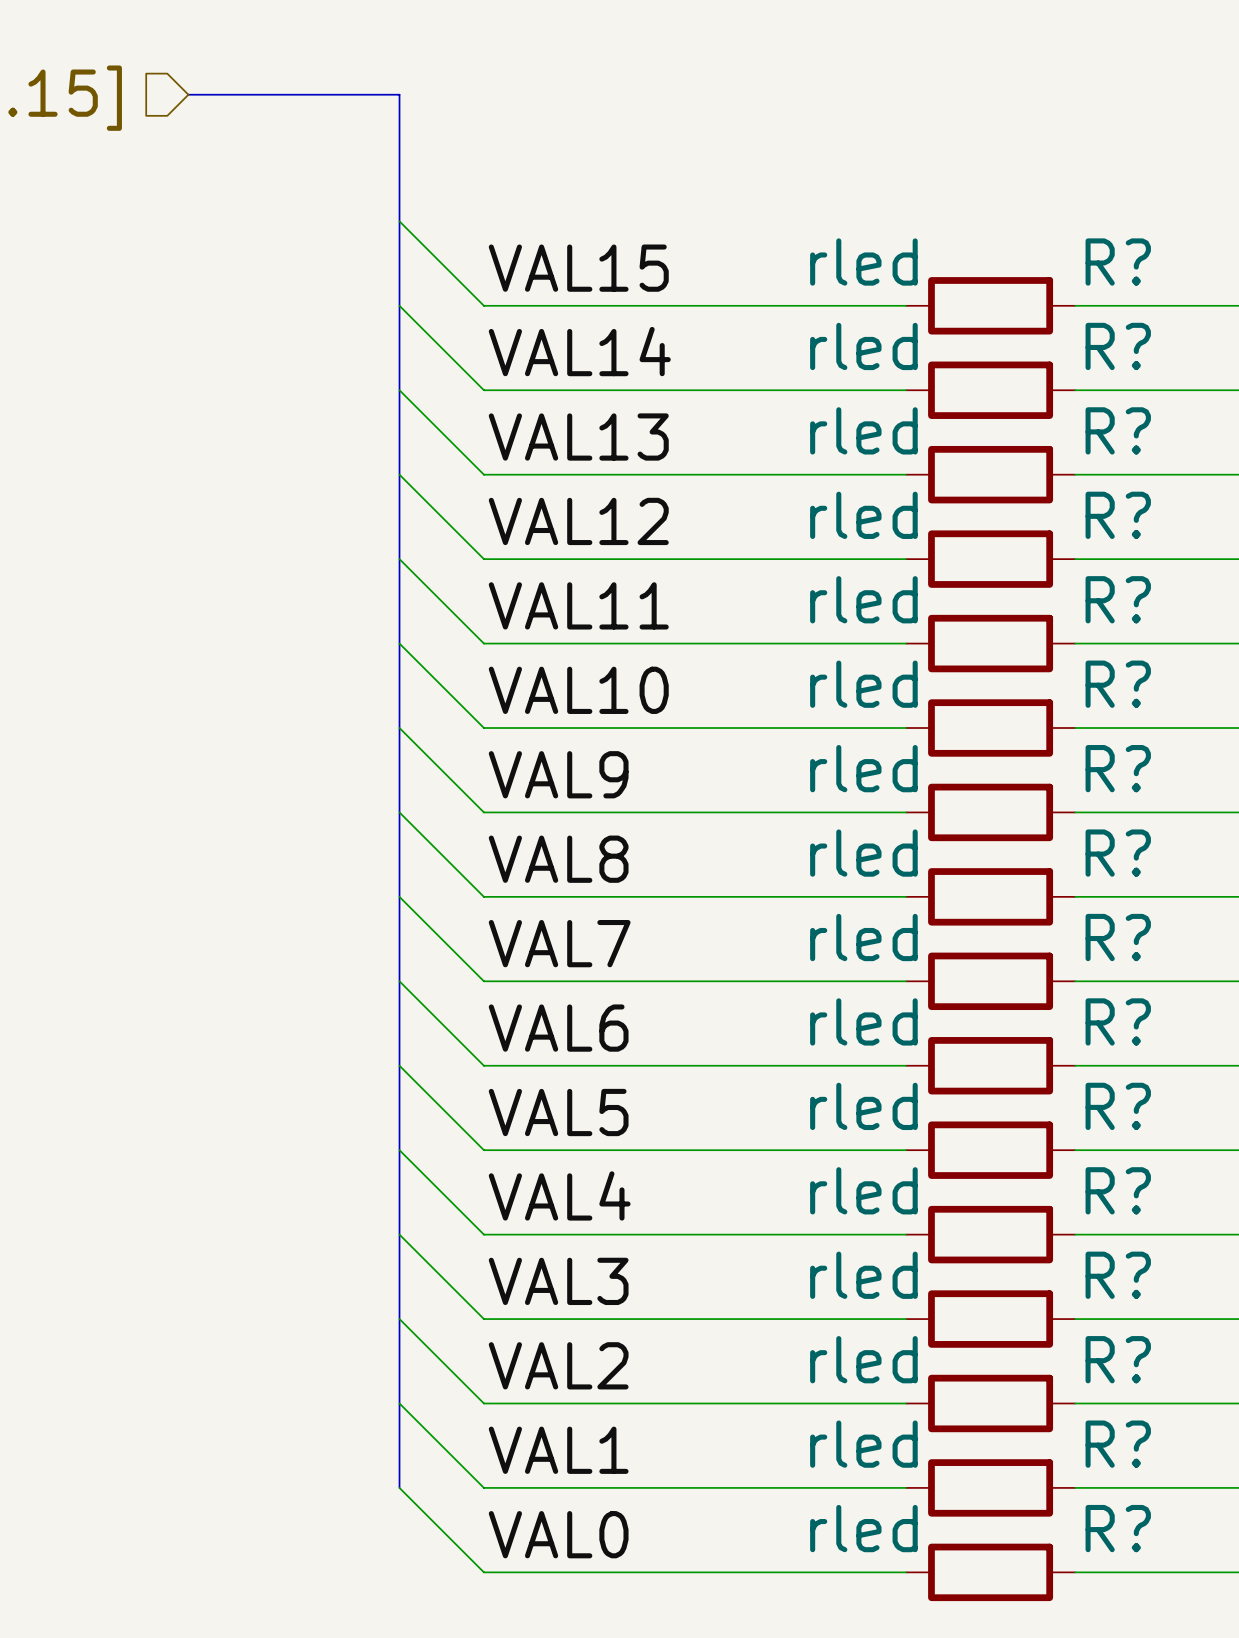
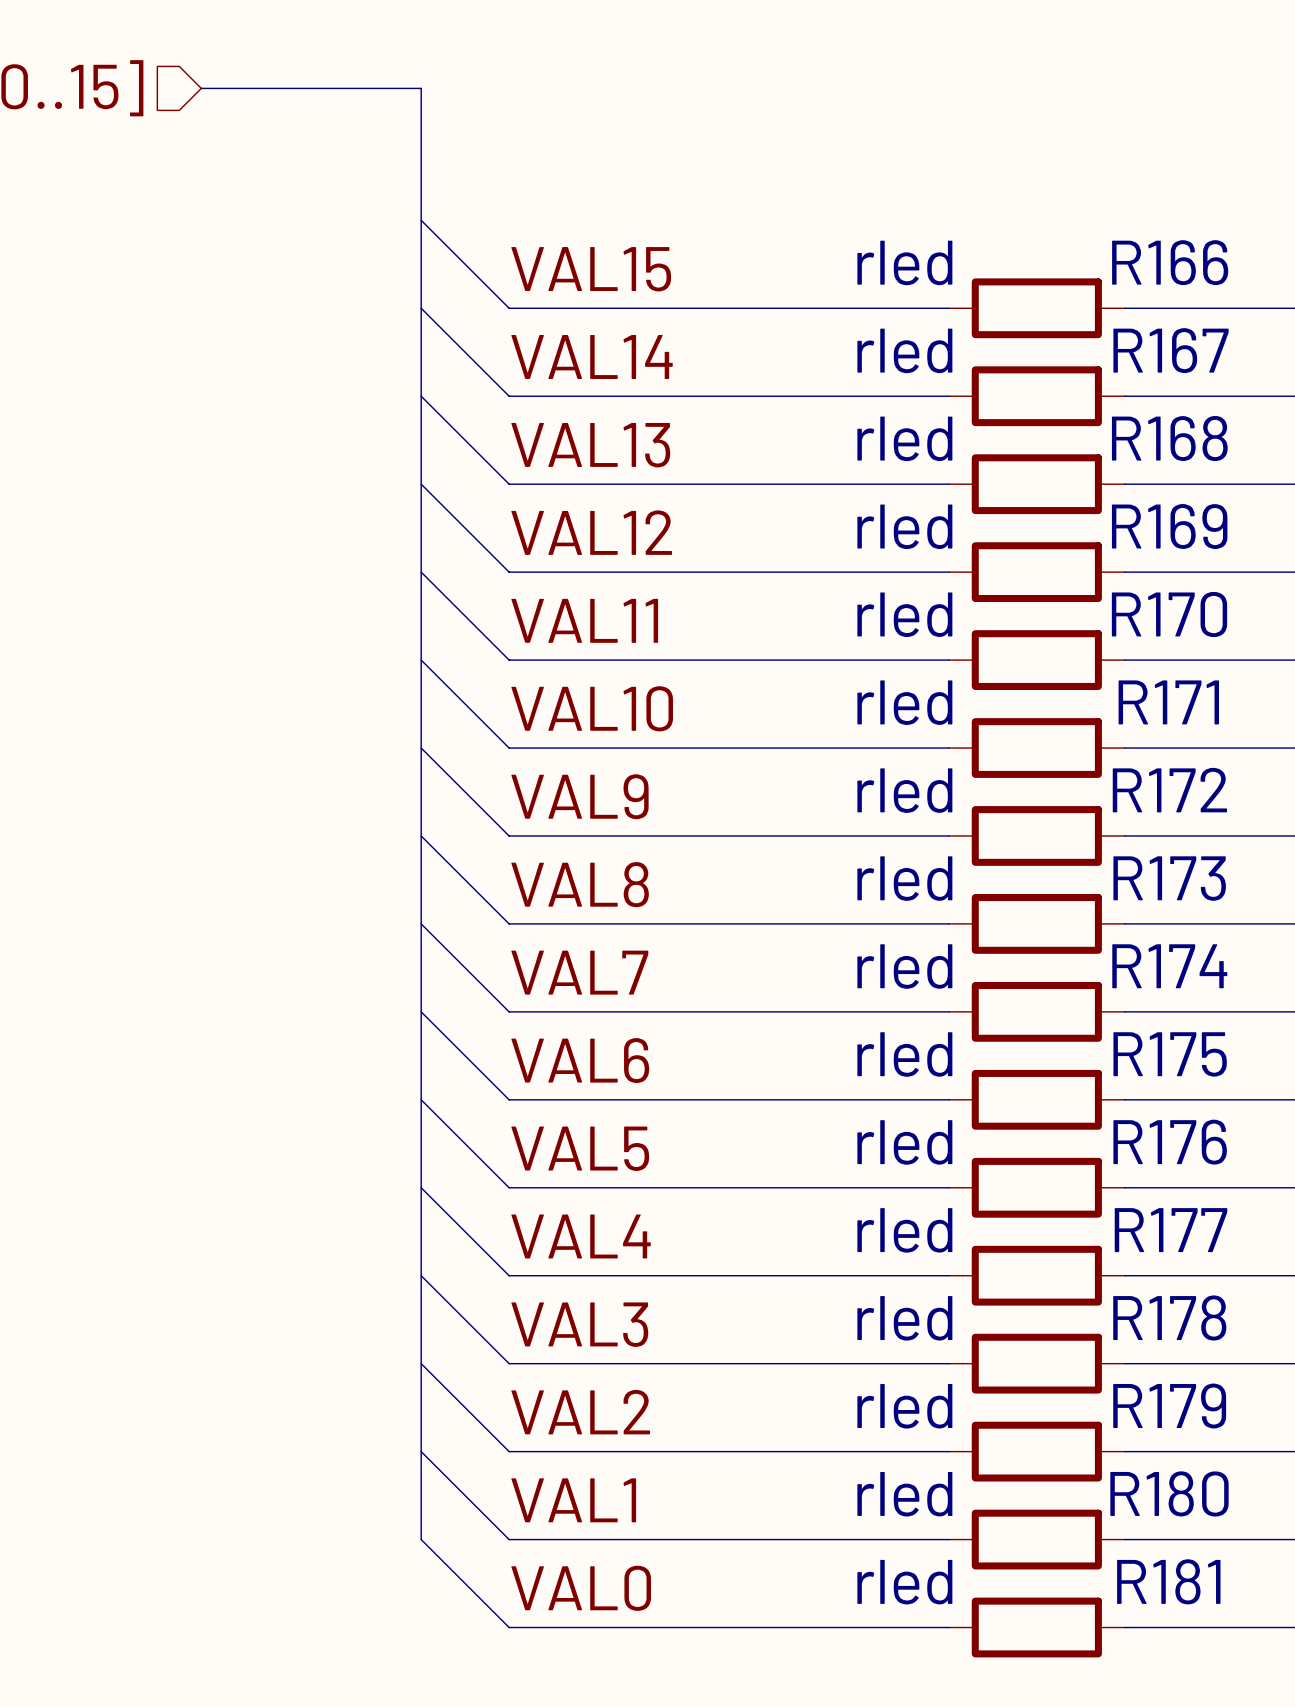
R? name: R? (1118, 262) -> R166 (1170, 262)
R? name: R? (1118, 346) -> R167 (1171, 350)
R? name: R? (1118, 430) -> R168 (1169, 438)
R? name: R? (1118, 515) -> R169 (1169, 526)
R? name: R? (1118, 599) -> R170 (1169, 614)
R? name: R? (1118, 684) -> R171 (1168, 702)
R? name: R? (1118, 768) -> R172 (1169, 790)
R? name: R? (1118, 853) -> R173 (1169, 878)
R? name: R? (1118, 937) -> R174 (1169, 966)
R? name: R? (1118, 1021) -> R175 (1170, 1054)
R? name: R? (1118, 1106) -> R176 (1170, 1142)
R? name: R? (1118, 1190) -> R177 (1171, 1230)
R? name: R? (1118, 1275) -> R178 (1169, 1317)
R? name: R? (1118, 1359) -> R179 (1169, 1406)
R? name: R? (1118, 1444) -> R180 (1169, 1493)
R? name: R? (1118, 1528) -> R181 (1168, 1581)

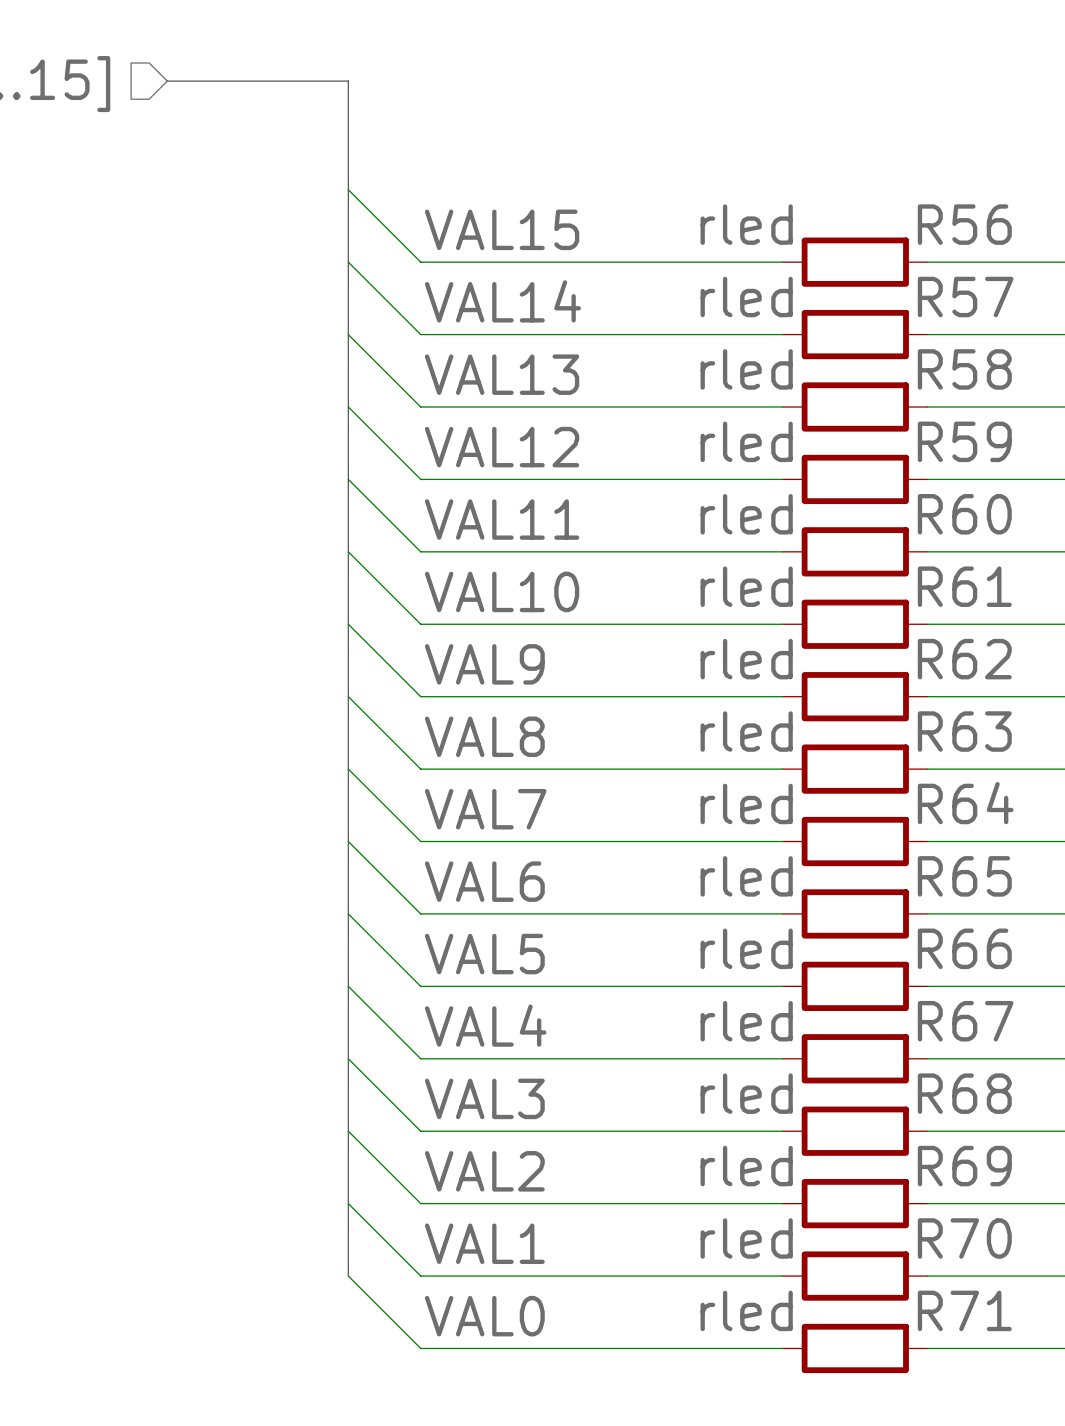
R166 name: R166 (1170, 262) -> R56 (964, 224)
R167 name: R167 (1171, 350) -> R57 (965, 297)
R168 name: R168 (1169, 438) -> R58 (964, 369)
R169 name: R169 (1169, 526) -> R59 (964, 441)
R170 name: R170 (1169, 614) -> R60 (964, 514)
R171 name: R171 (1168, 702) -> R61 (964, 586)
R172 name: R172 (1169, 790) -> R62 (964, 659)
R173 name: R173 (1169, 878) -> R63 (964, 731)
R174 name: R174 (1169, 966) -> R64 (965, 803)
R175 name: R175 (1170, 1054) -> R65 (964, 876)
R176 name: R176 (1170, 1142) -> R66 (964, 948)
R177 name: R177 (1171, 1230) -> R67 (965, 1021)
R178 name: R178 (1169, 1317) -> R68 (964, 1093)
R179 name: R179 (1169, 1406) -> R69 (964, 1166)
R180 name: R180 (1169, 1493) -> R70 (964, 1238)
R181 name: R181 (1168, 1581) -> R71 (964, 1310)

